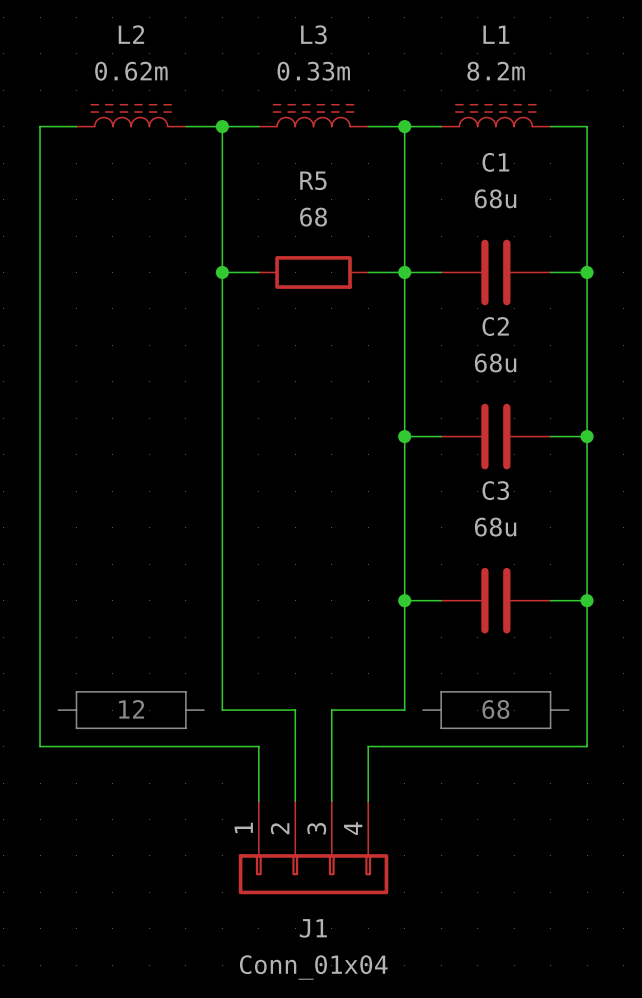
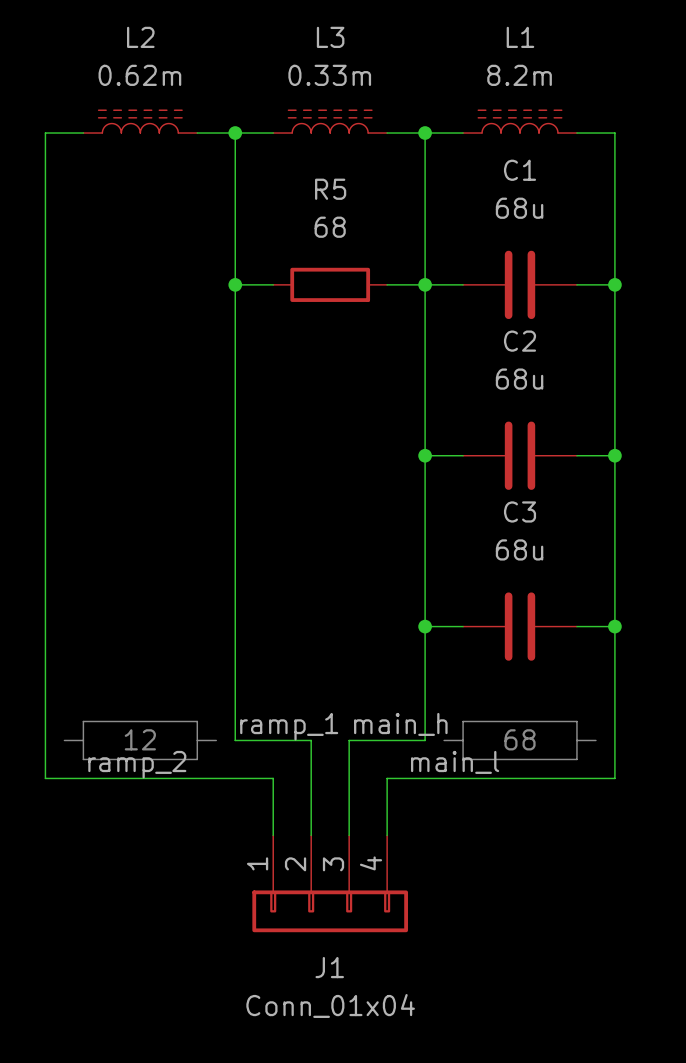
label: none -> ramp_1 (289, 726)
label: none -> main_h (400, 724)
label: none -> main_l (455, 762)
label: none -> ramp_2 (137, 764)

